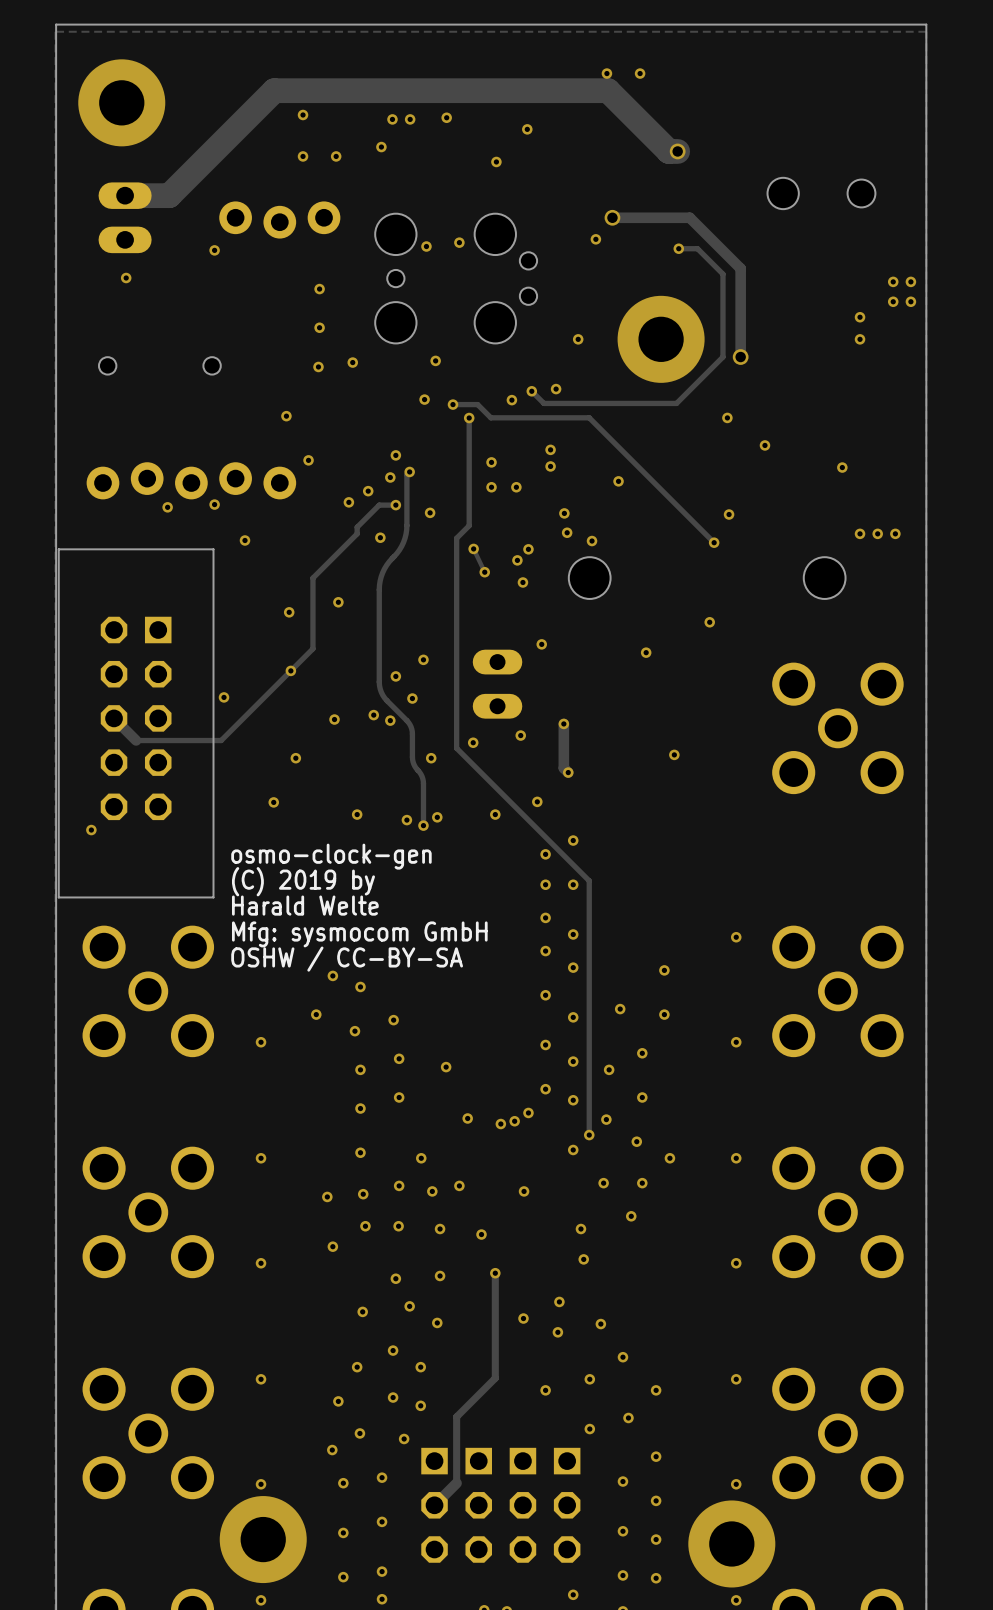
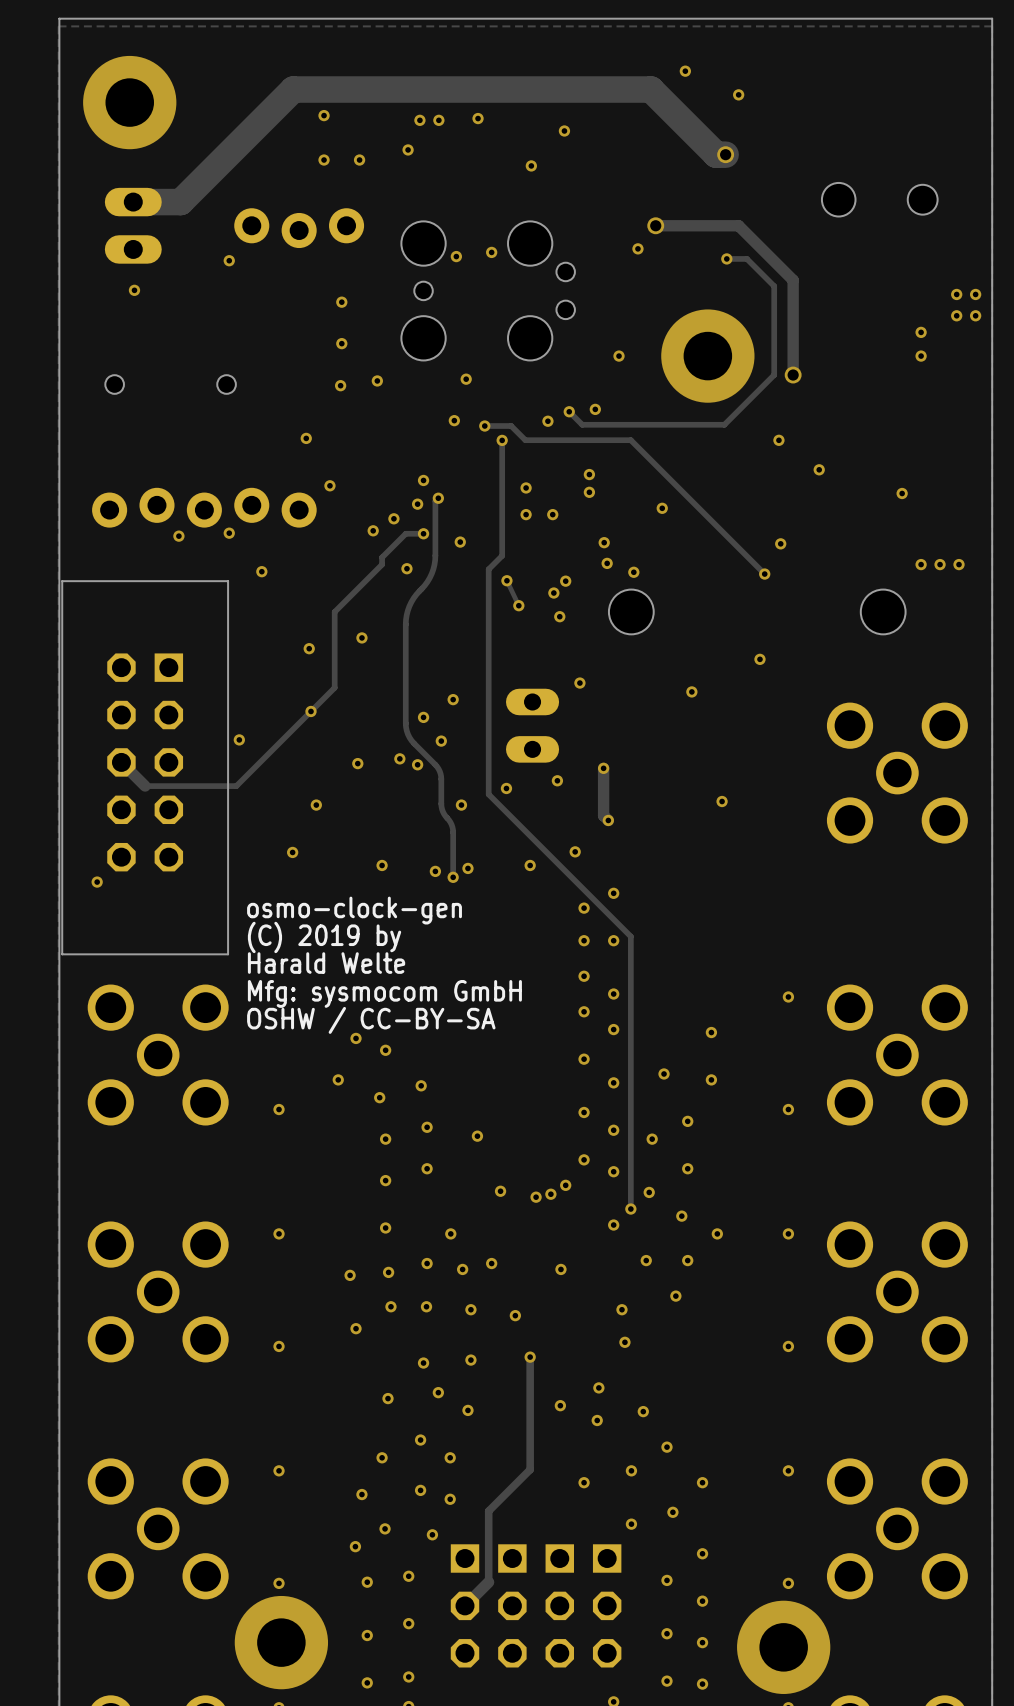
via position: (606, 73) -> (738, 94)

